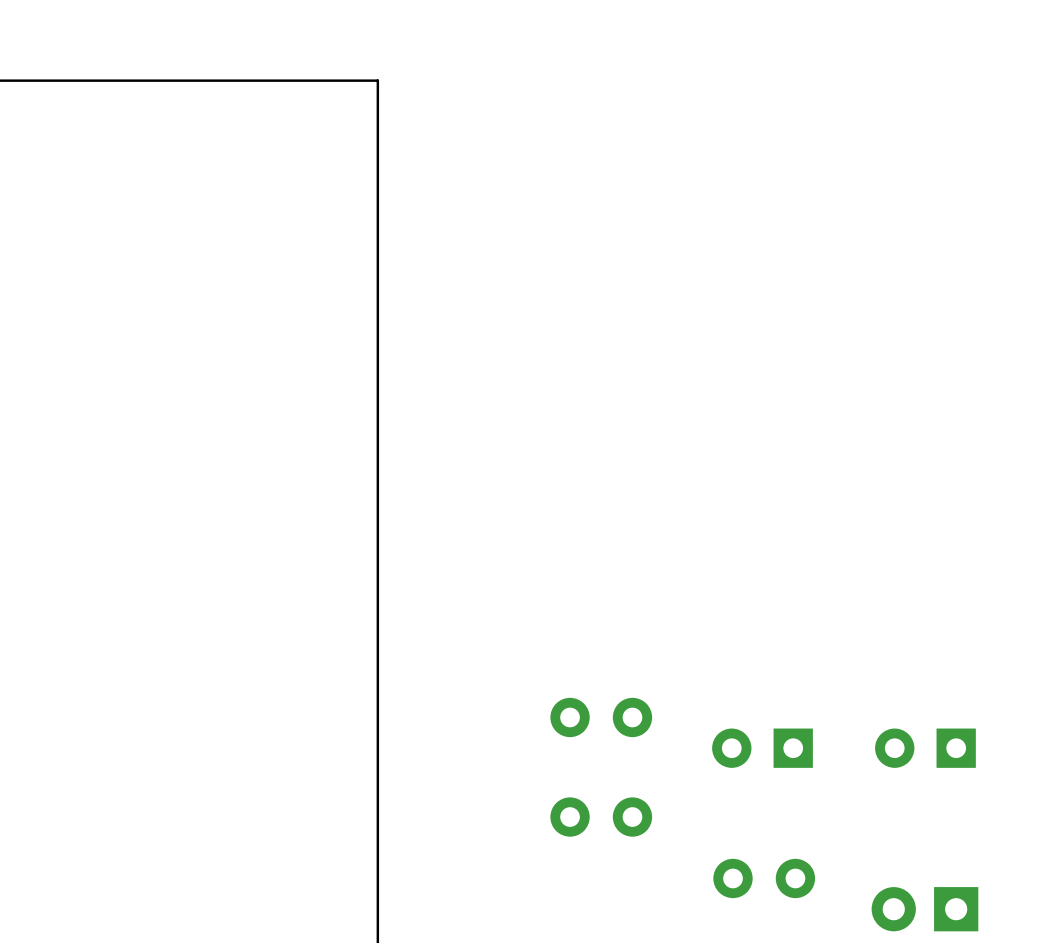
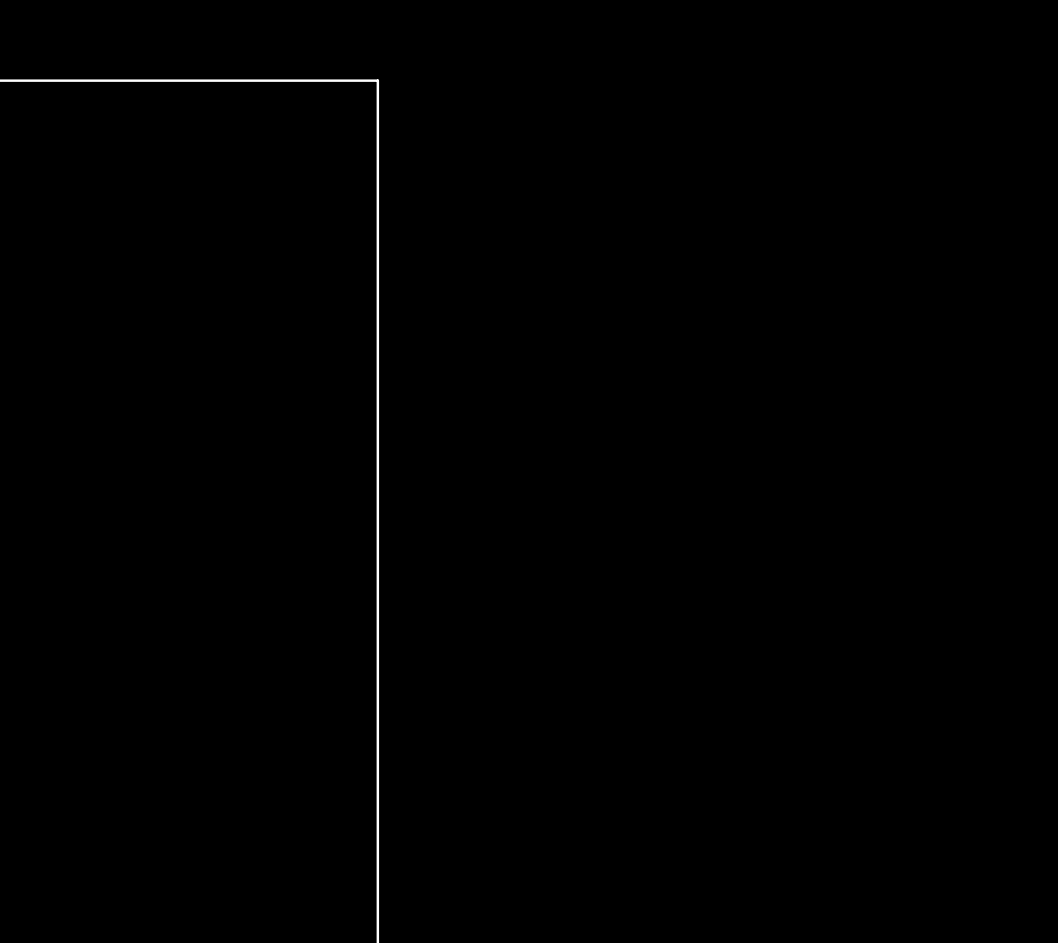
part: (601, 717) -> none
part: (762, 748) -> none
part: (925, 748) -> none
part: (601, 817) -> none
part: (764, 878) -> none
part: (924, 909) -> none

